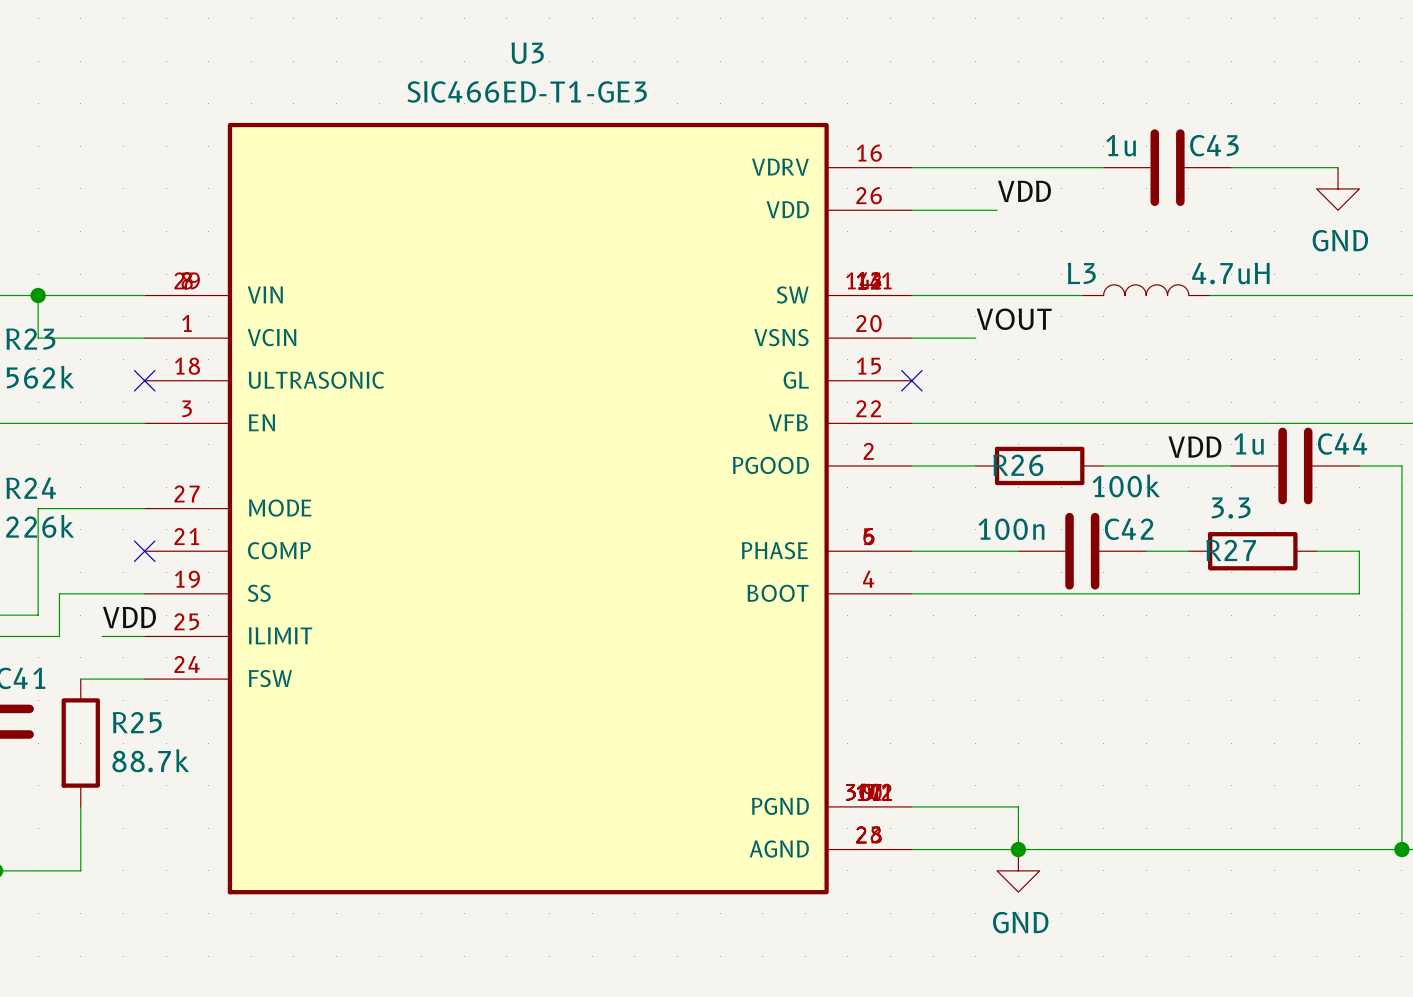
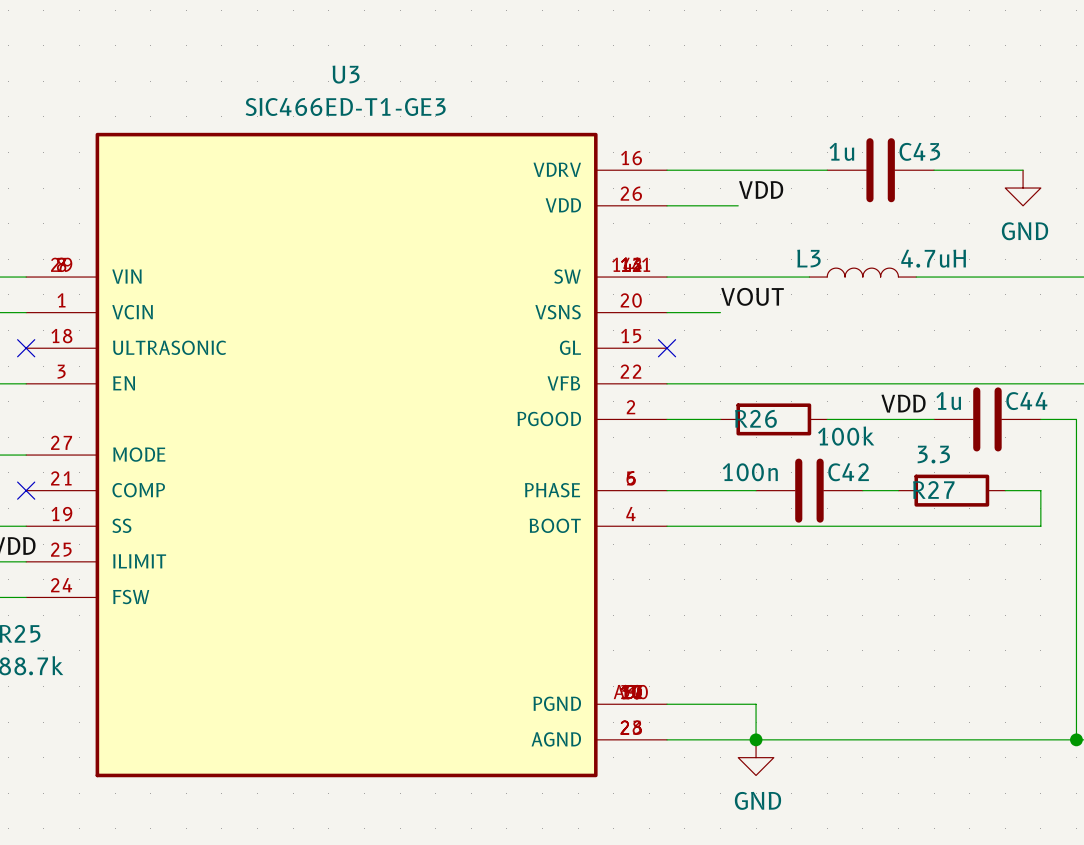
U3 symbol: [144, 122, 912, 895] -> [26, 132, 668, 778]

